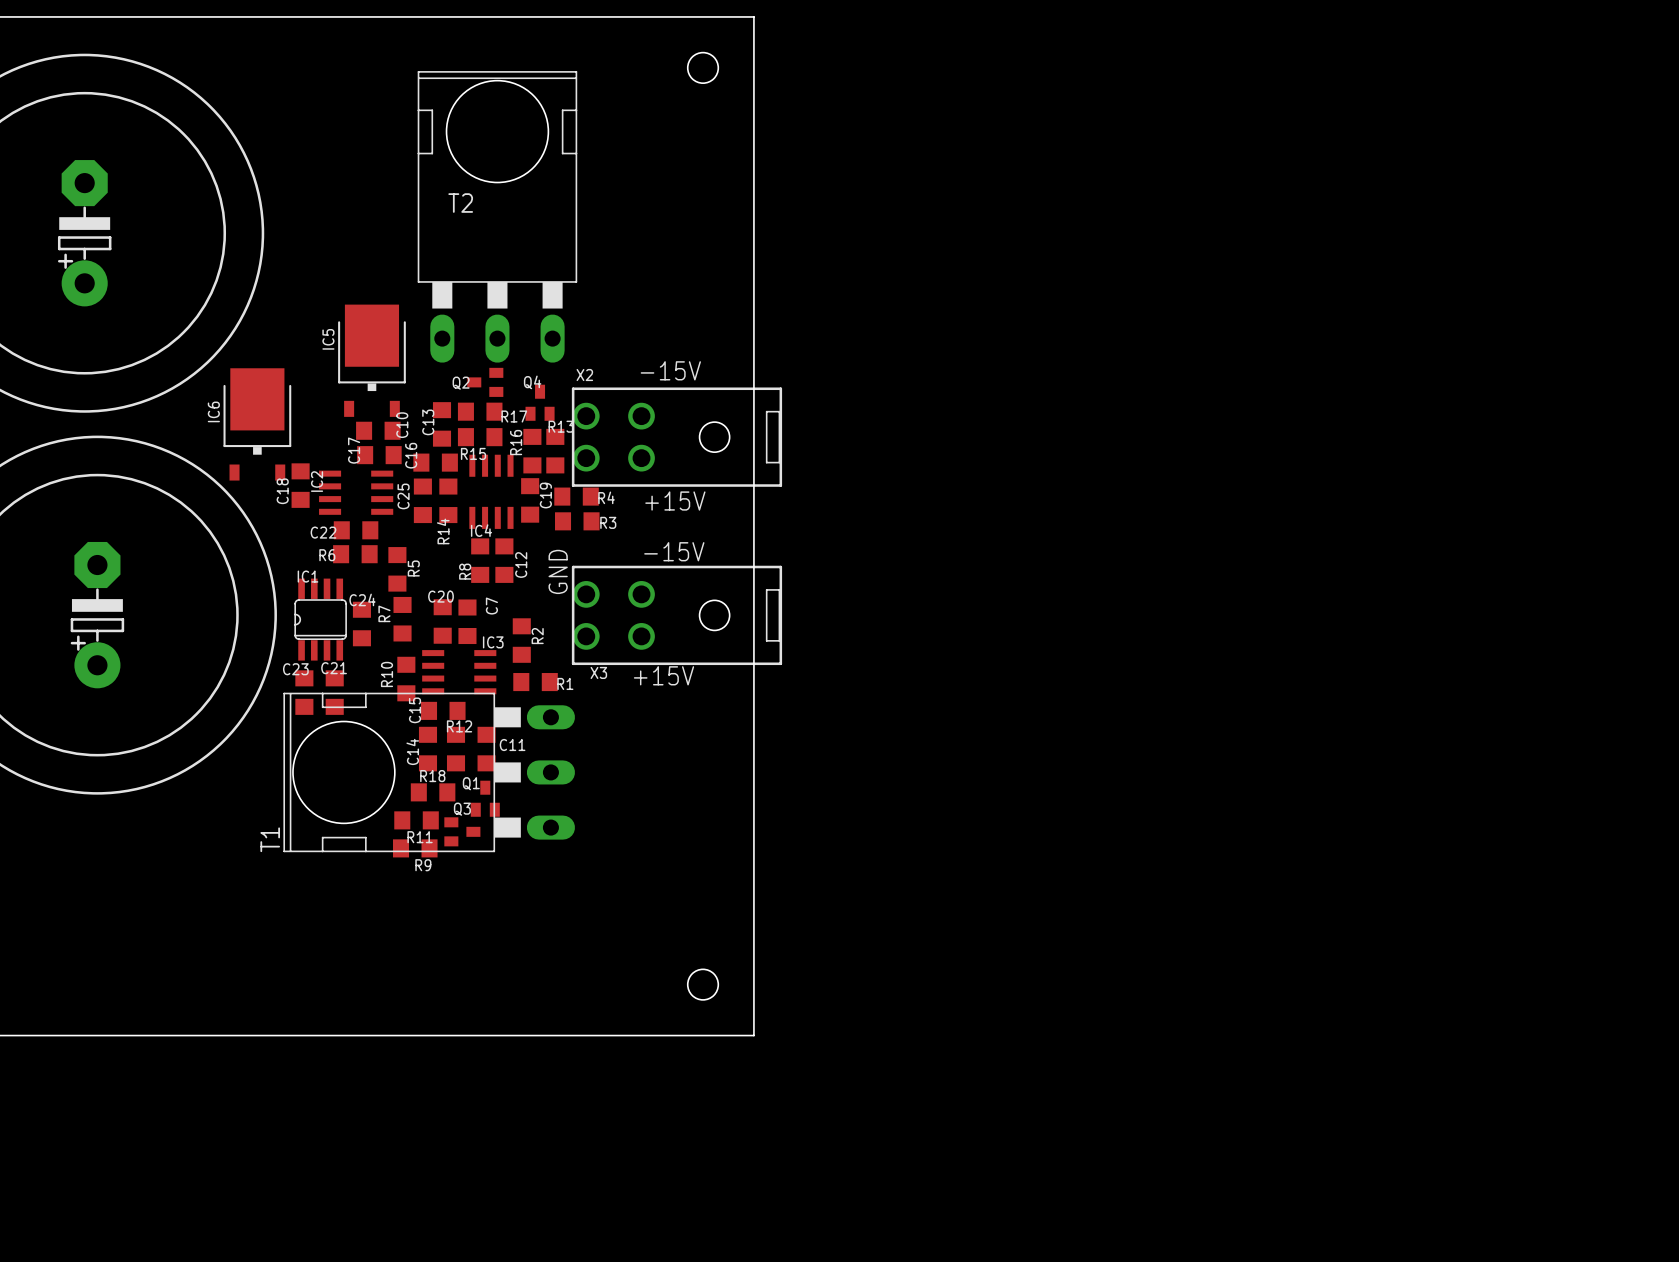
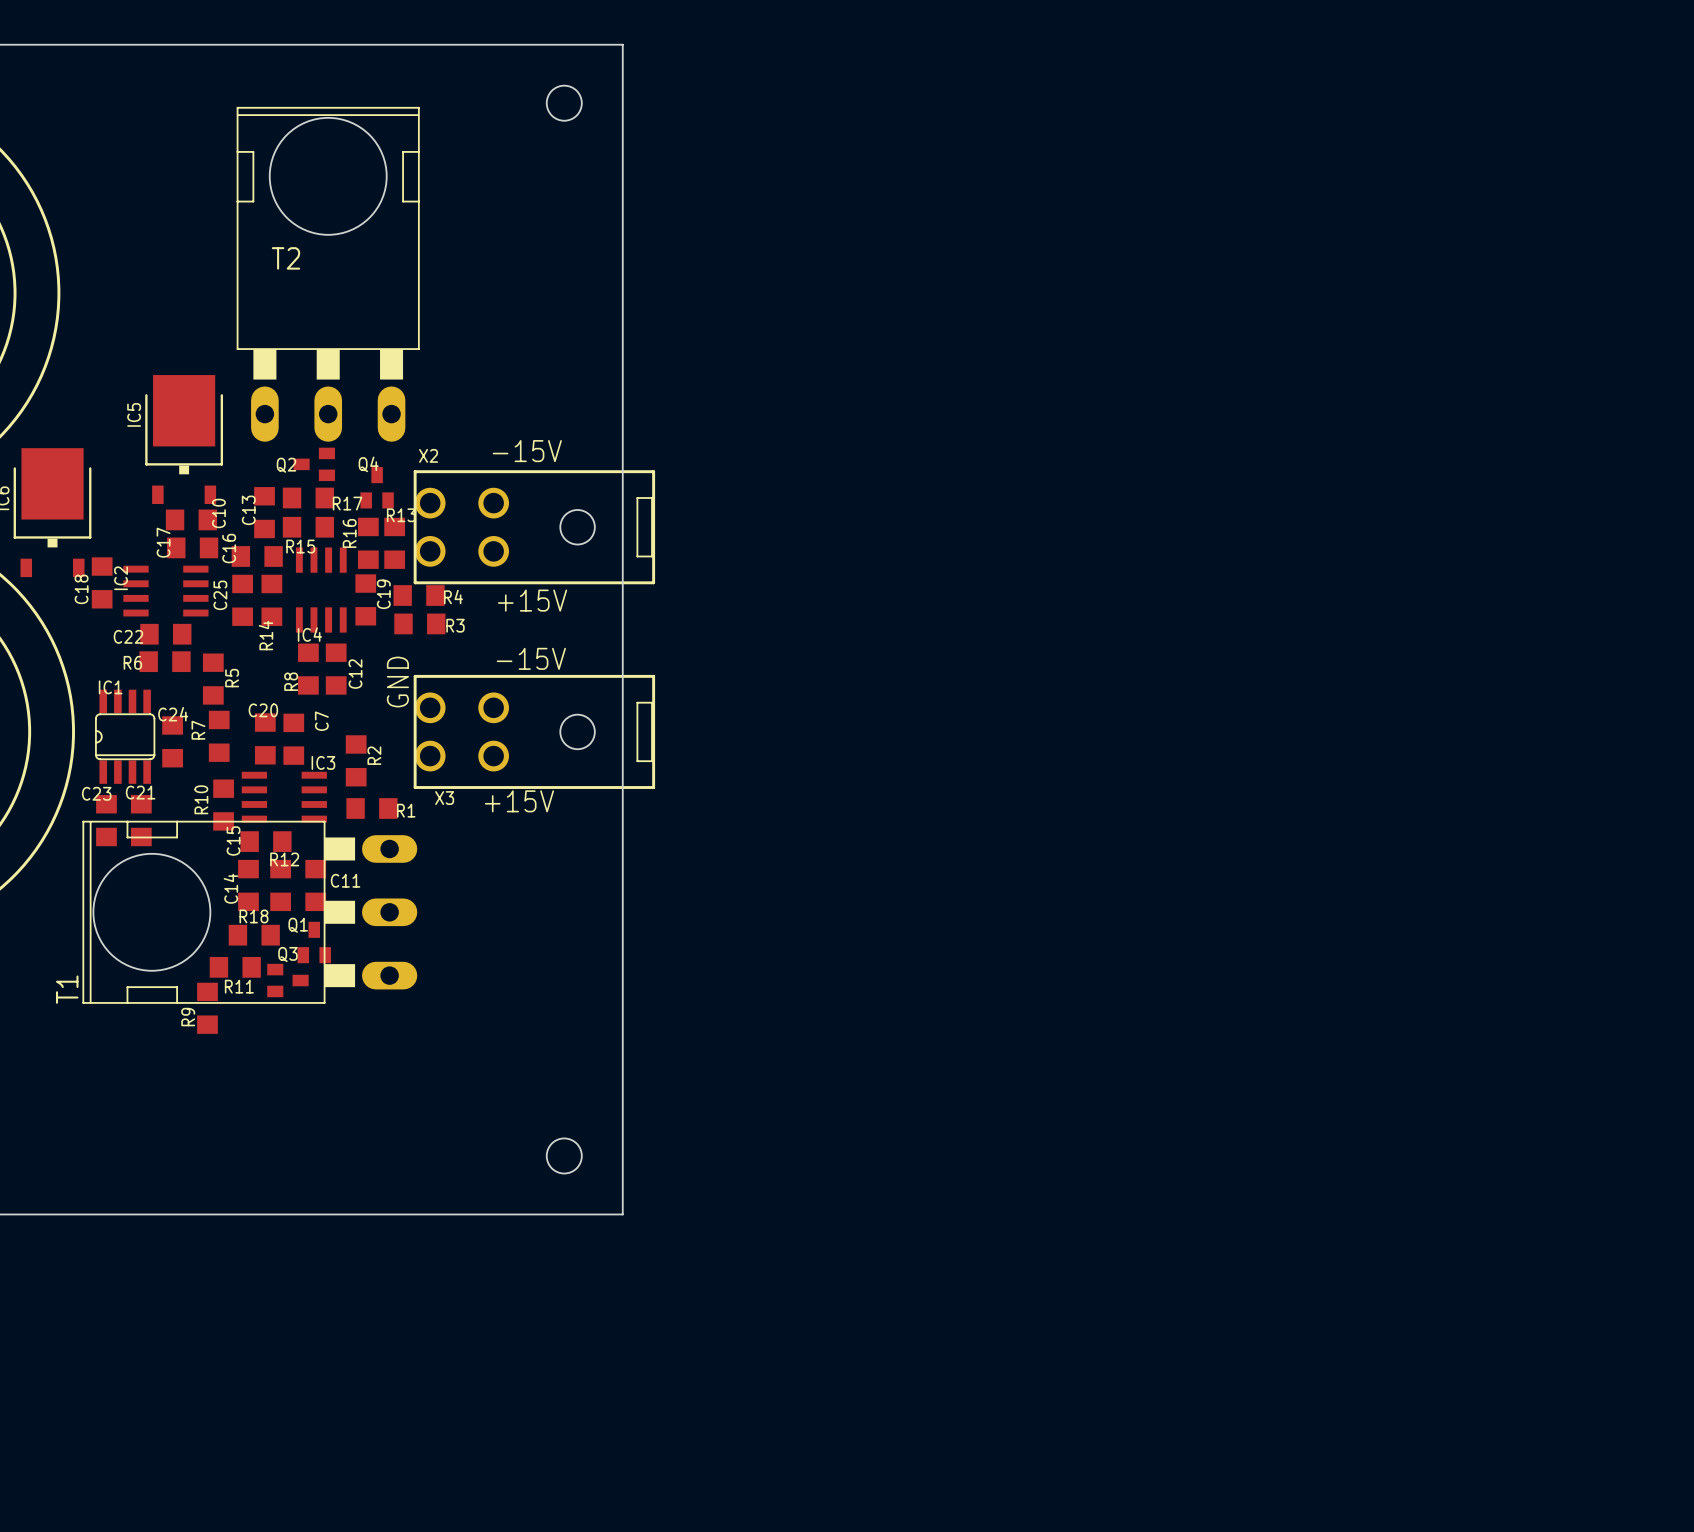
R9 rotation: 0° (415, 848) -> 90° clockwise (207, 1008)

